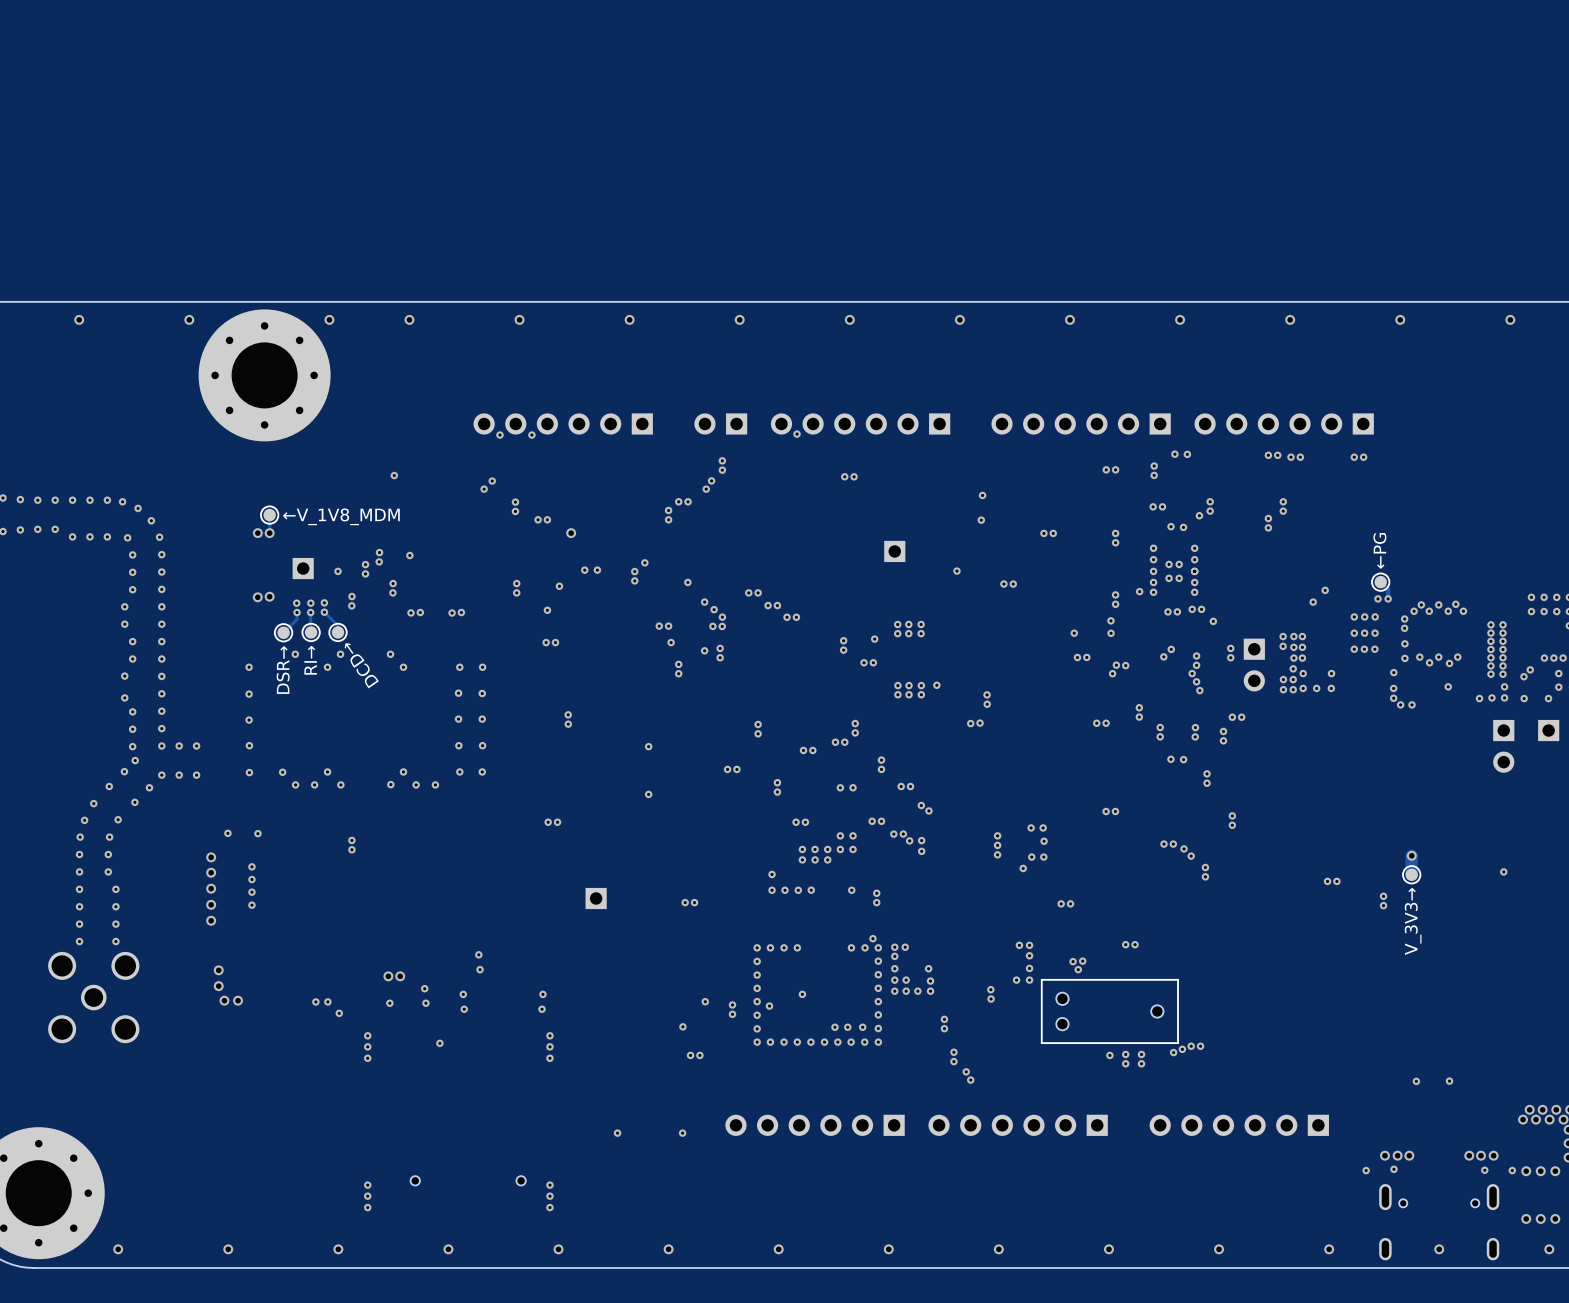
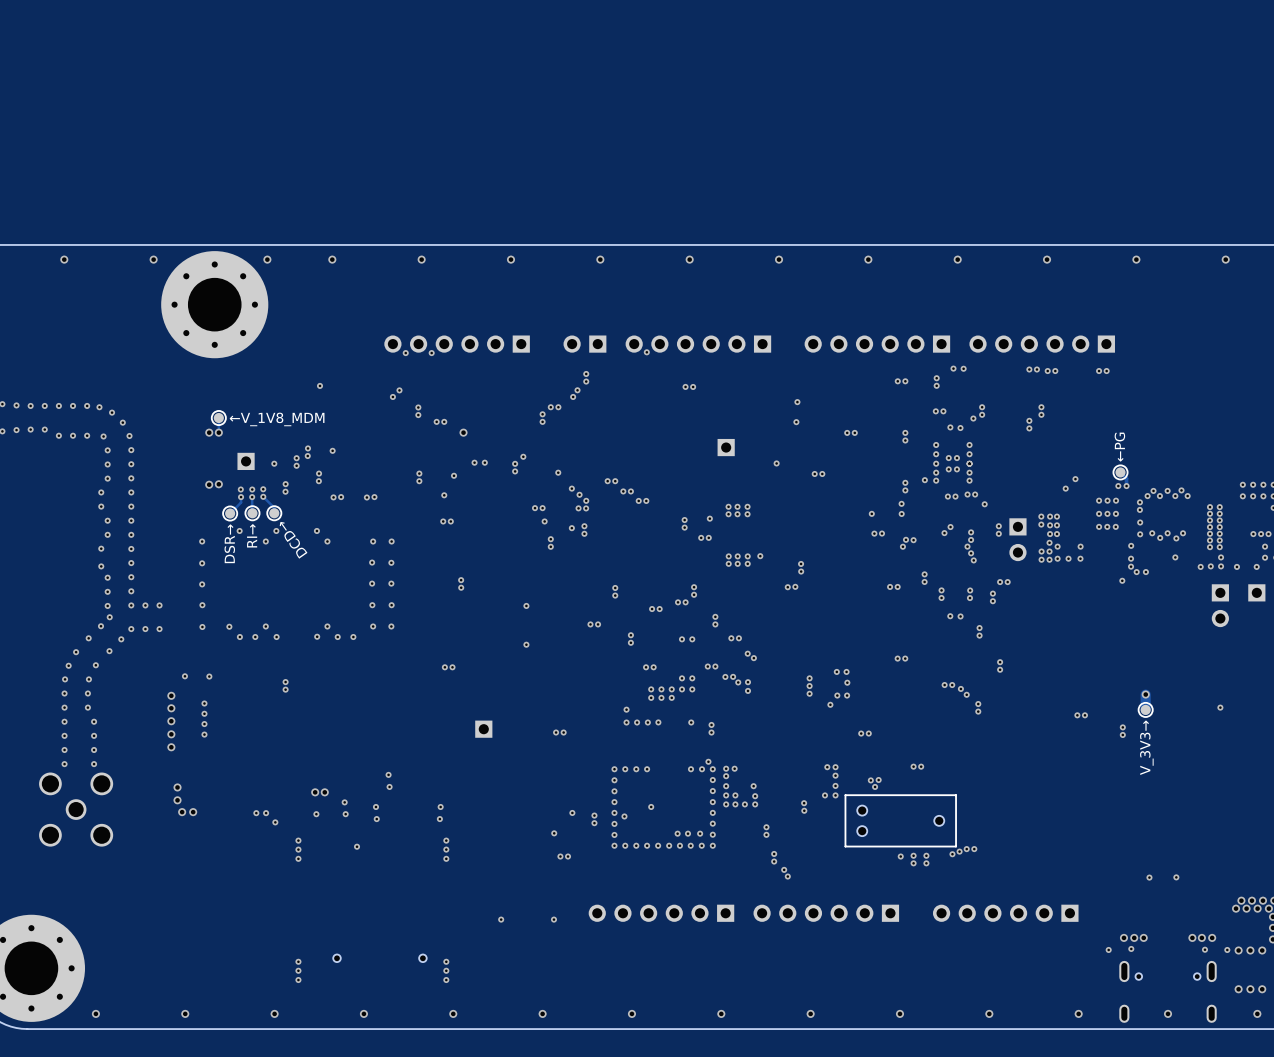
via: (1530, 669) -> none
via: (1523, 676) -> none
via: none -> (1122, 580)

